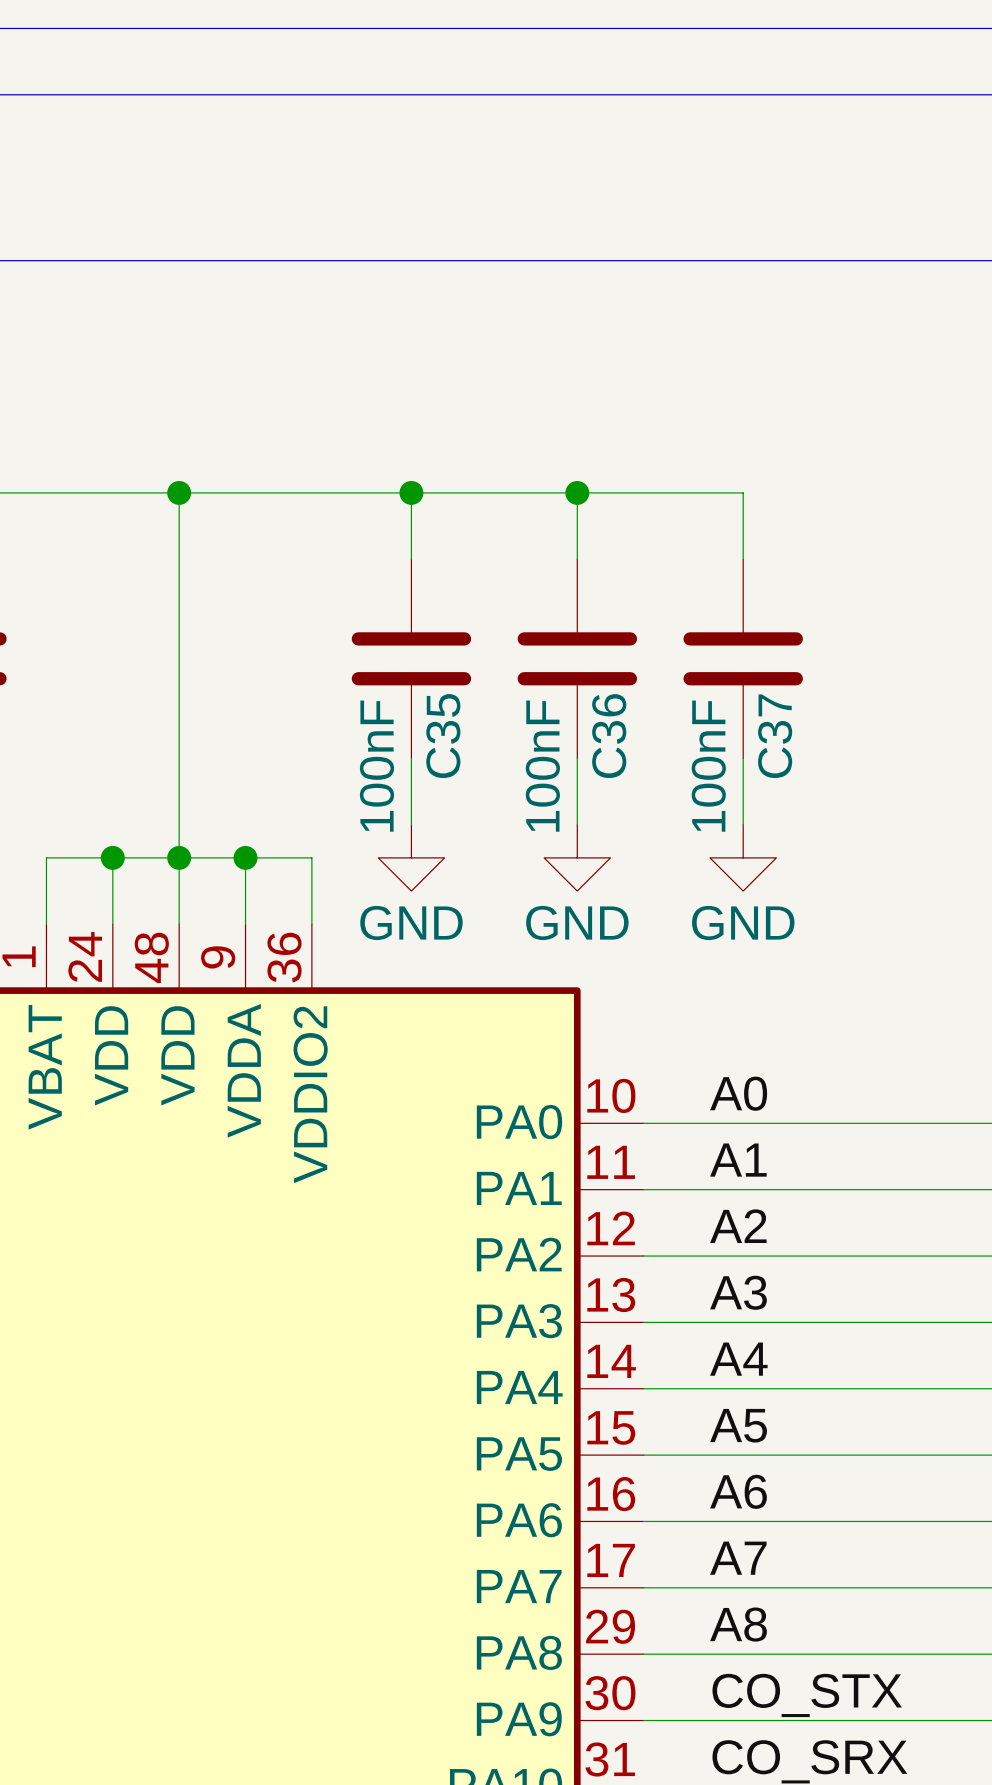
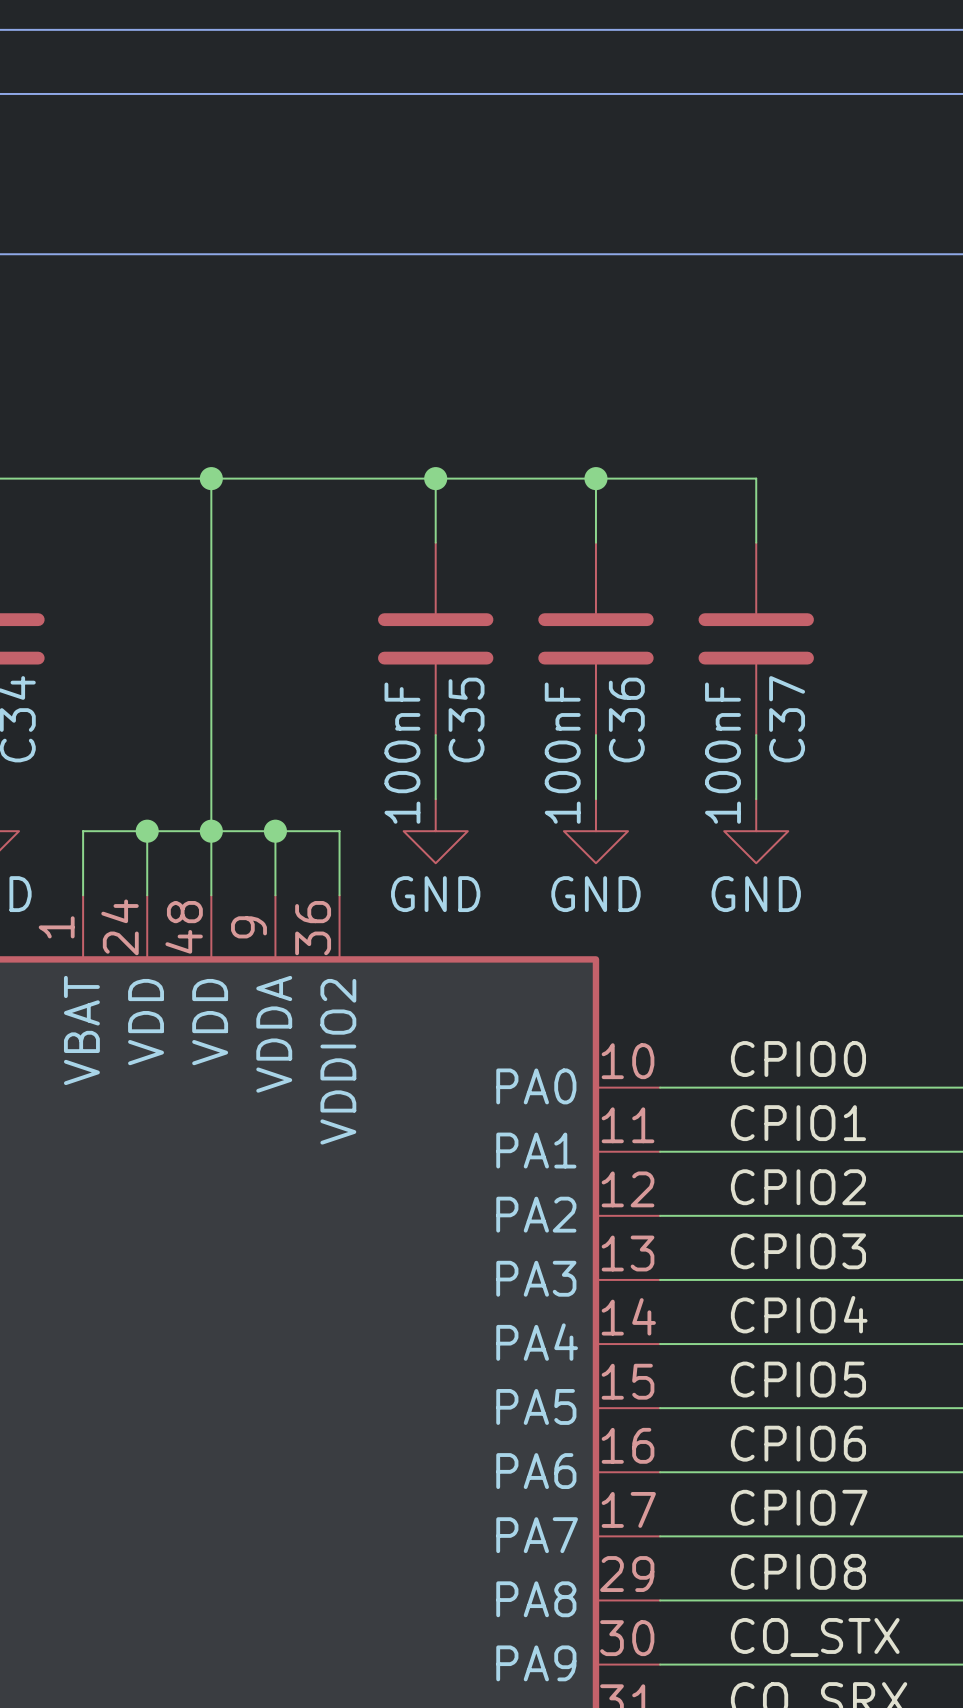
label: A0 (738, 1093) -> CPIO0 (798, 1059)
label: A1 (738, 1160) -> CPIO1 (798, 1123)
label: A2 (738, 1226) -> CPIO2 (798, 1187)
label: A3 (738, 1292) -> CPIO3 (798, 1251)
label: A4 (738, 1359) -> CPIO4 (799, 1314)
label: A5 (738, 1425) -> CPIO5 (798, 1379)
label: A6 (738, 1491) -> CPIO6 (798, 1443)
label: A7 (738, 1558) -> CPIO7 (799, 1507)
label: A8 (738, 1624) -> CPIO8 (798, 1571)

